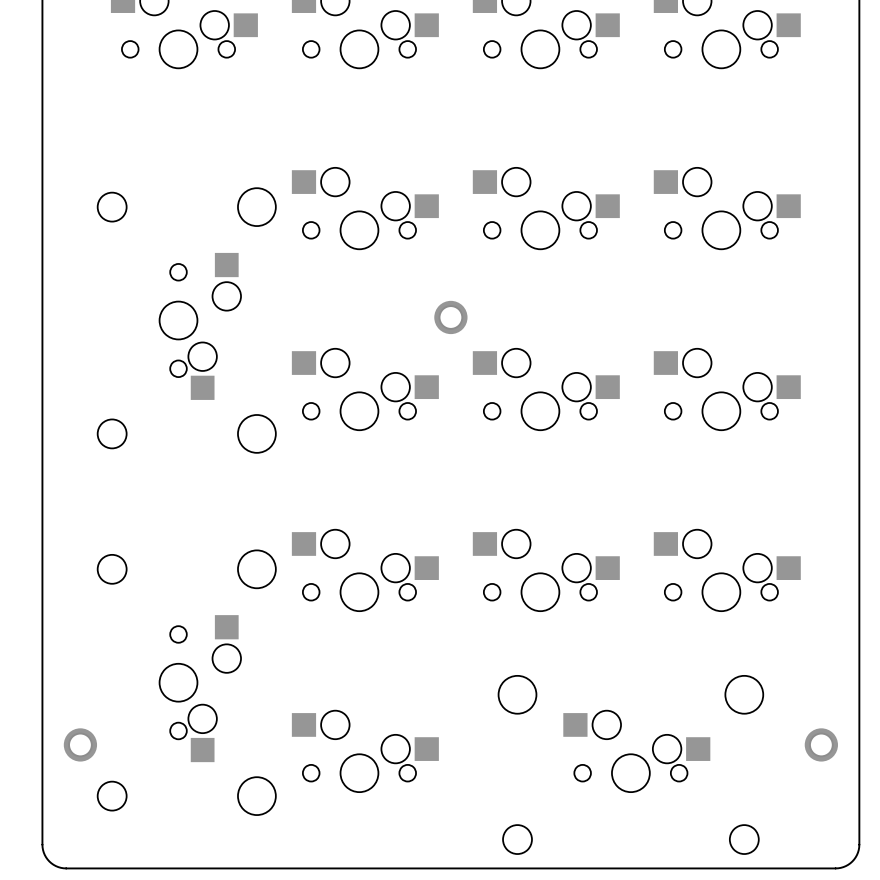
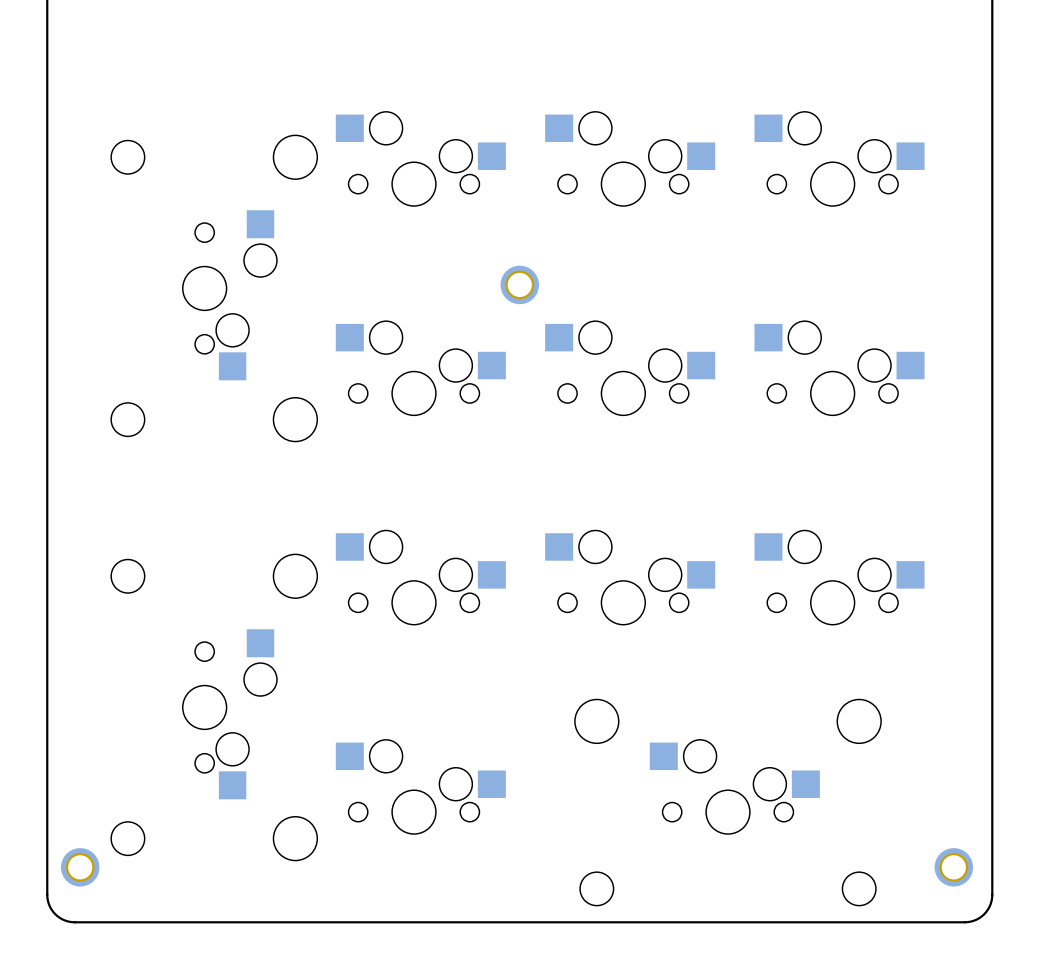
part position: (80, 744) -> (80, 867)
part position: (821, 744) -> (953, 867)

